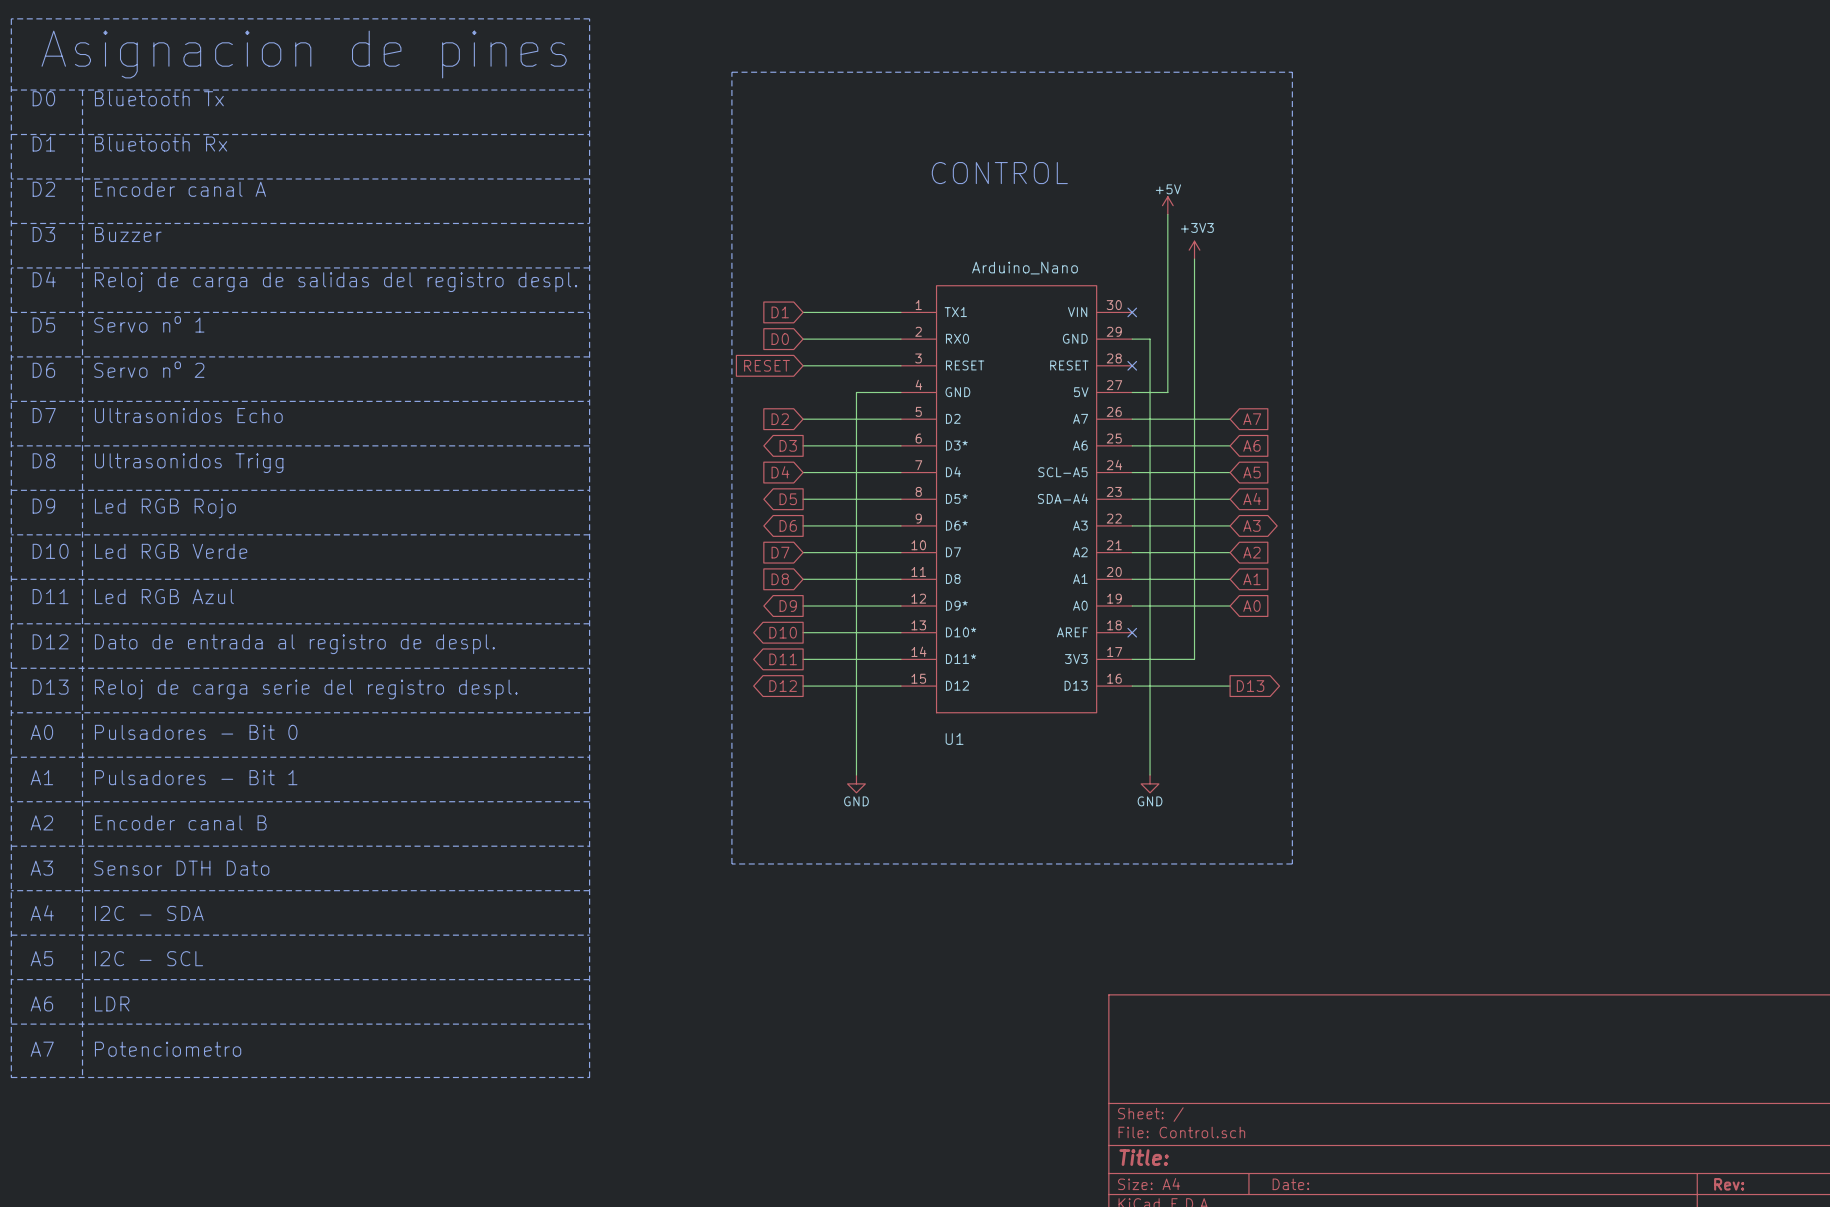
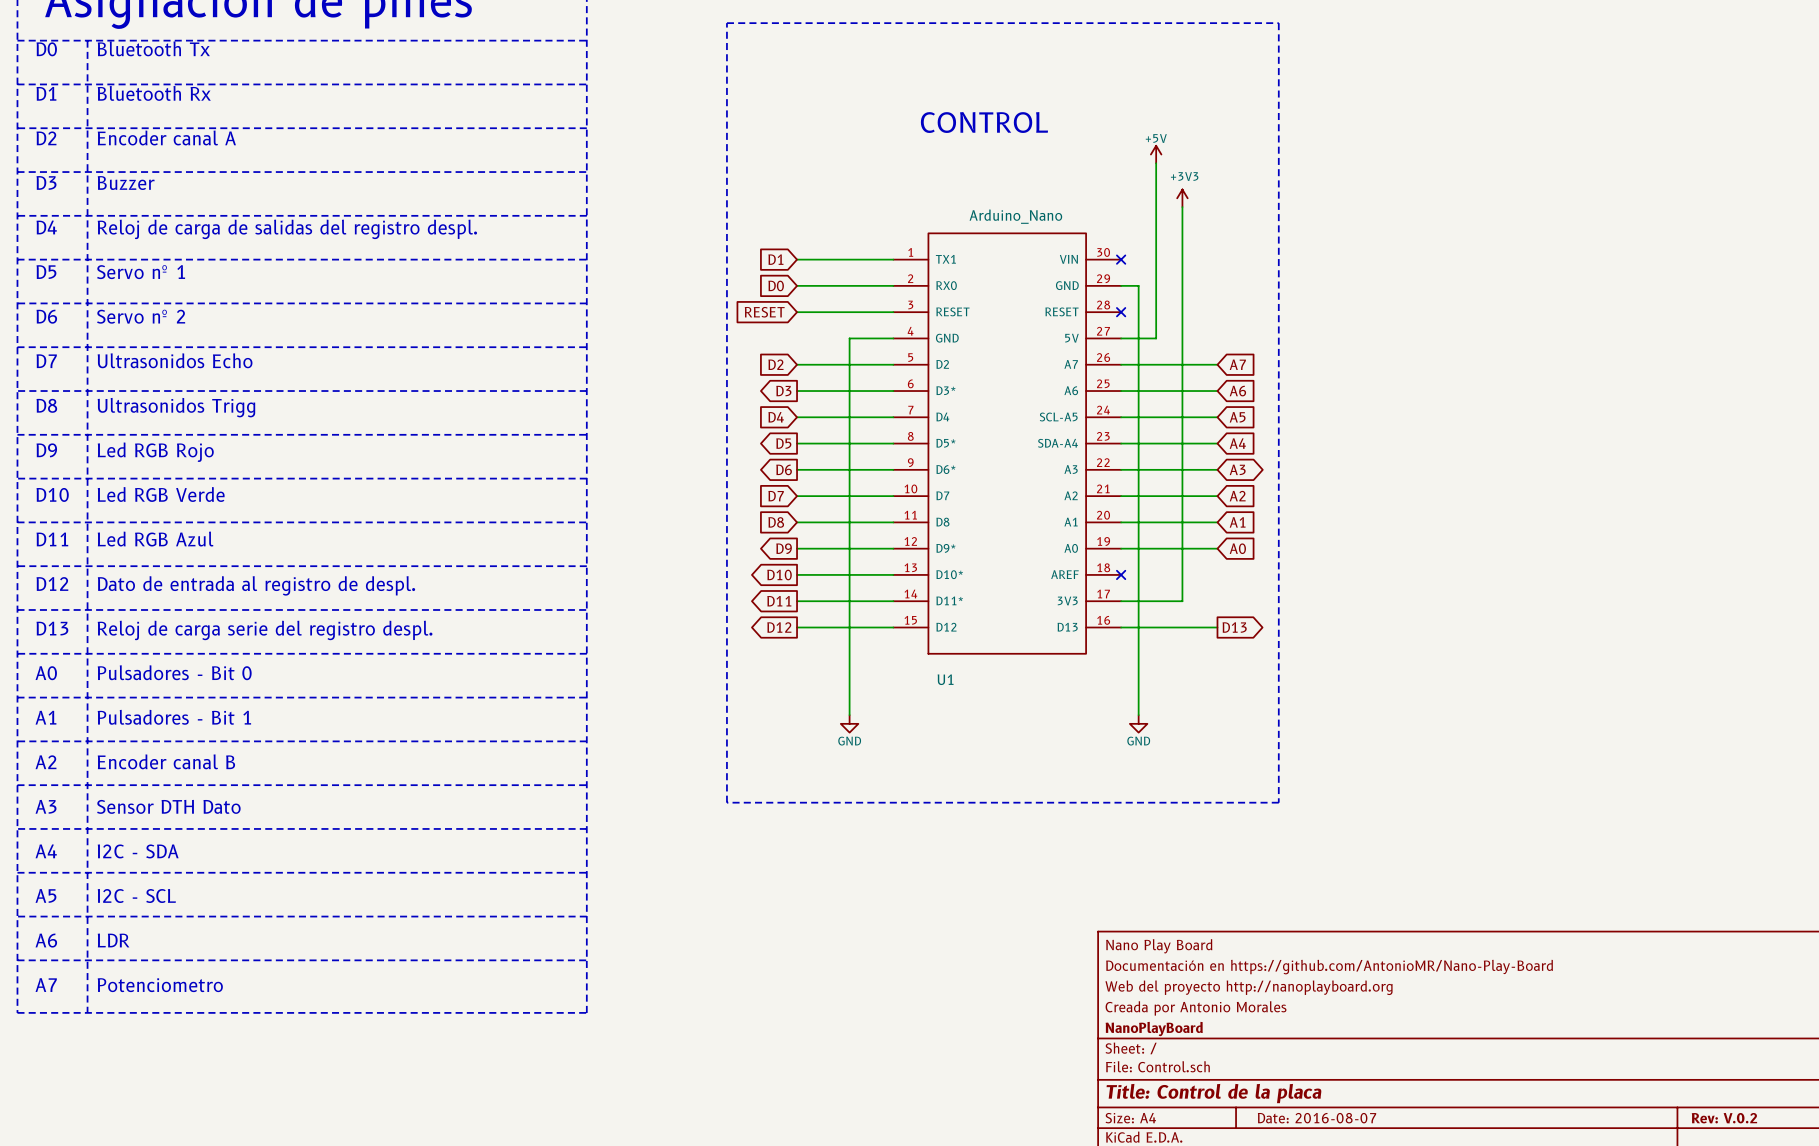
title block: none -> Nano Play Board (1159, 946)
title block: none -> Documentación en https://github.com/AntonioMR/Nano-Play-Board (1329, 967)
title block: none -> Web del proyecto http://nanoplayboard.org (1249, 987)
title block: none -> Creada por Antonio Morales (1196, 1008)
title block: none -> NanoPlayBoard (1154, 1029)
title block: Title: (1144, 1157) -> Title: Control de la placa (1213, 1093)
title block: Date: (1290, 1184) -> Date: 2016-08-07 (1317, 1118)
title block: Rev: (1729, 1184) -> Rev: V.0.2 (1724, 1118)

